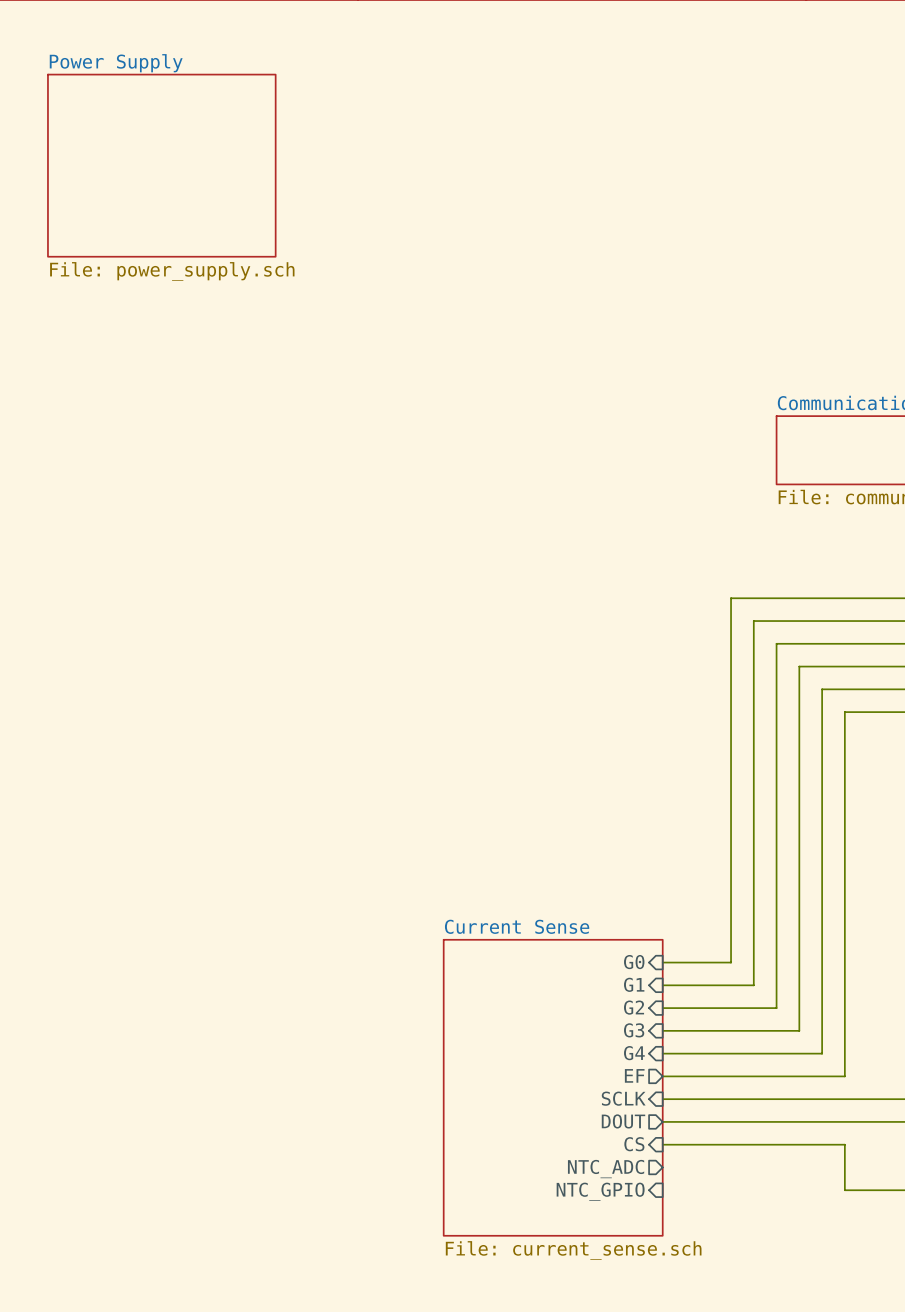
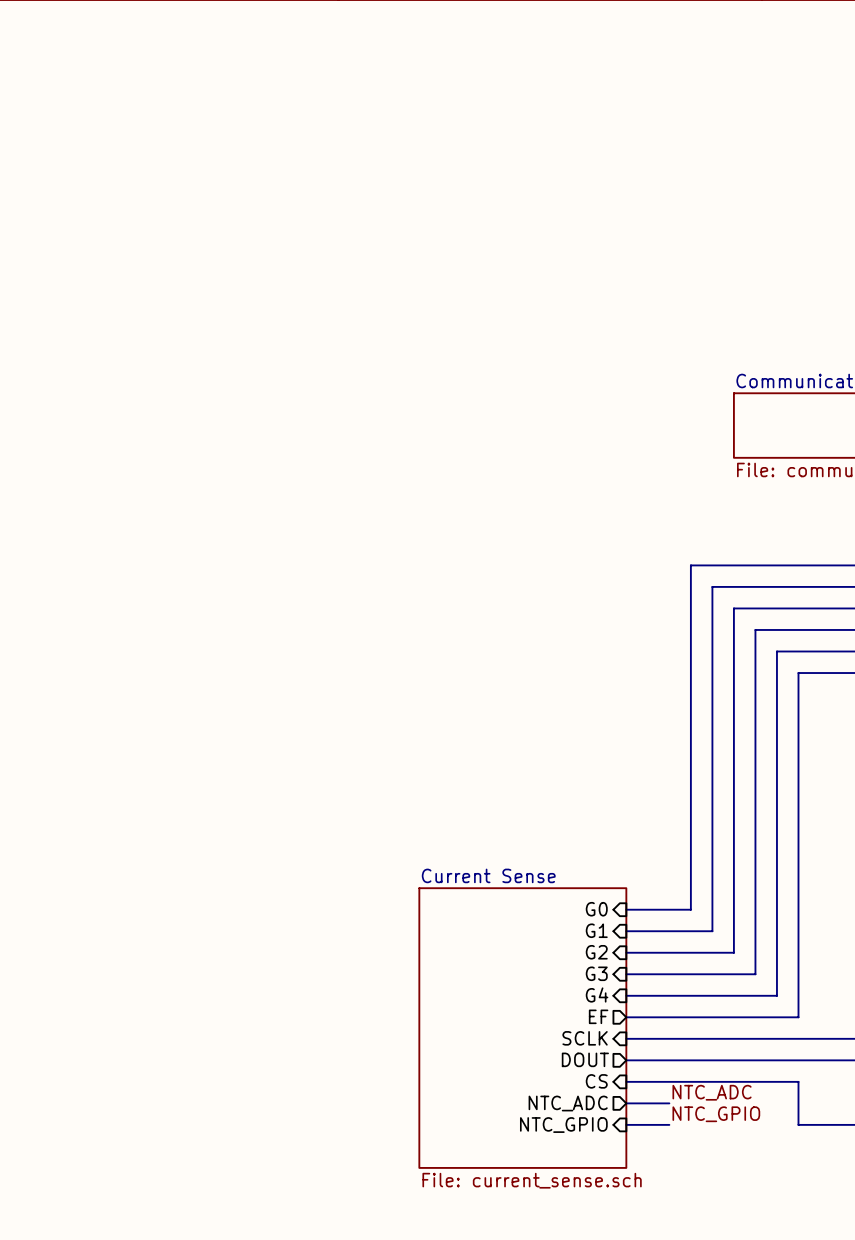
sheet Power Supply: File: power_supply.sch (161, 165) -> none
label: none -> NTC_ADC (712, 1092)
wire: none -> (626, 1103) (669, 1103)
label: none -> NTC_GPIO (716, 1114)
wire: none -> (626, 1124) (669, 1124)

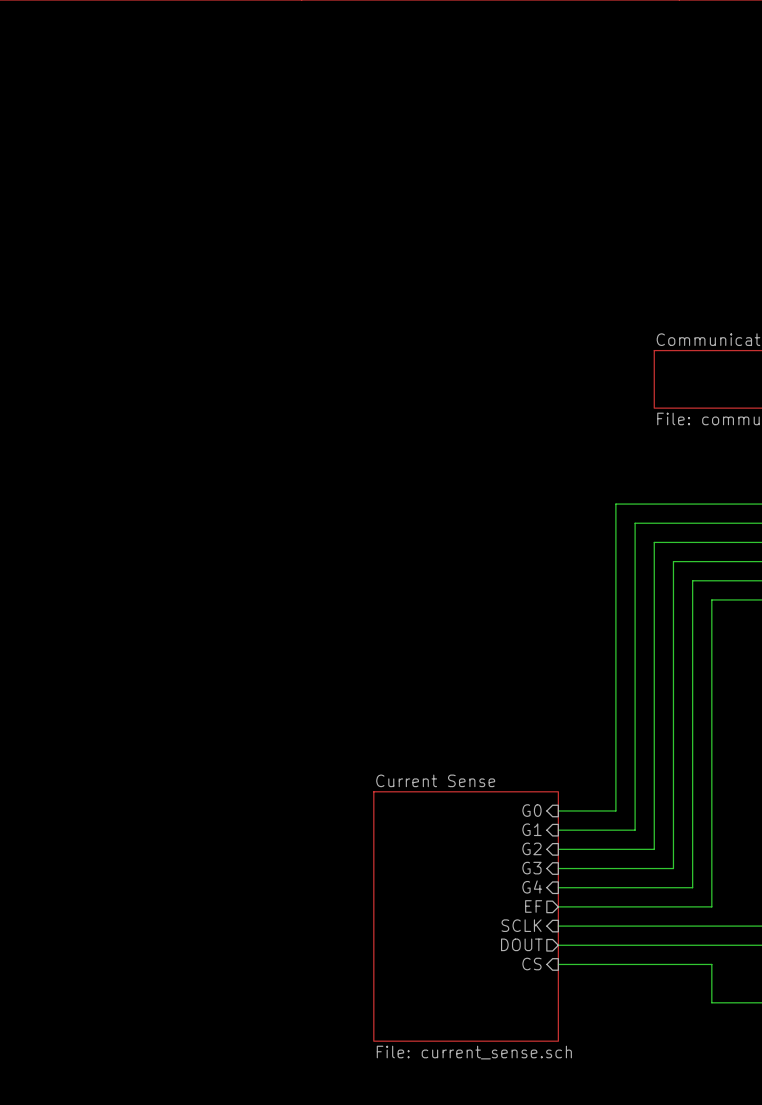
label: NTC_ADC (712, 1092) -> none
sheet pin: NTC_ADC (568, 1103) -> none
wire: (626, 1103) (669, 1103) -> none
label: NTC_GPIO (716, 1114) -> none
wire: (626, 1124) (669, 1124) -> none
sheet pin: NTC_GPIO (563, 1125) -> none

